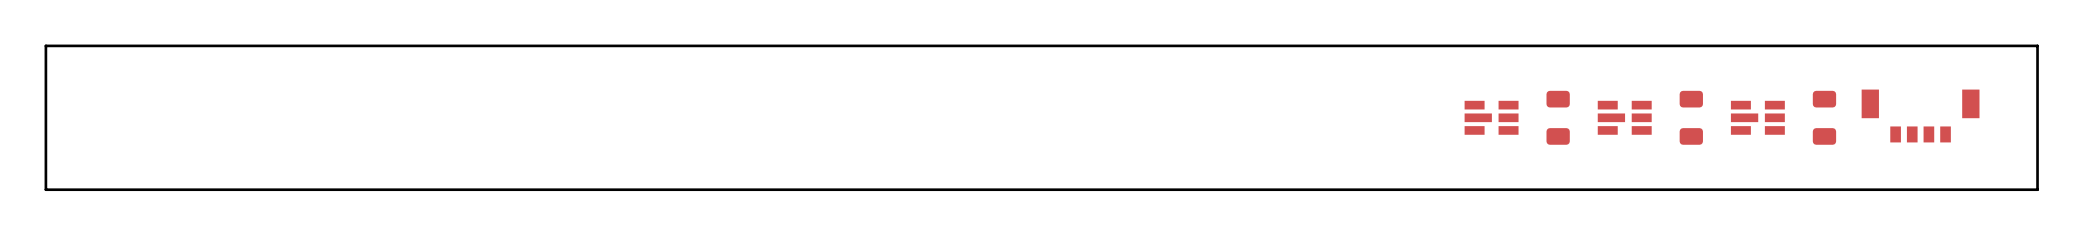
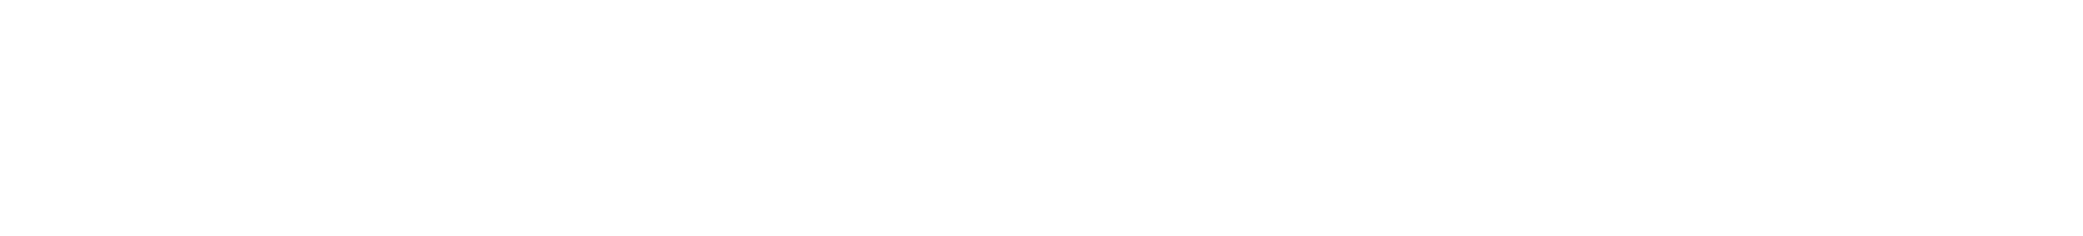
board edge: (2037, 45) (45, 45) (45, 189) (2037, 189) (2037, 45) -> none
part: (1920, 116) -> none
part: (1491, 117) -> none
part: (1558, 117) -> none
part: (1624, 117) -> none
part: (1691, 117) -> none
part: (1757, 117) -> none
part: (1824, 117) -> none

